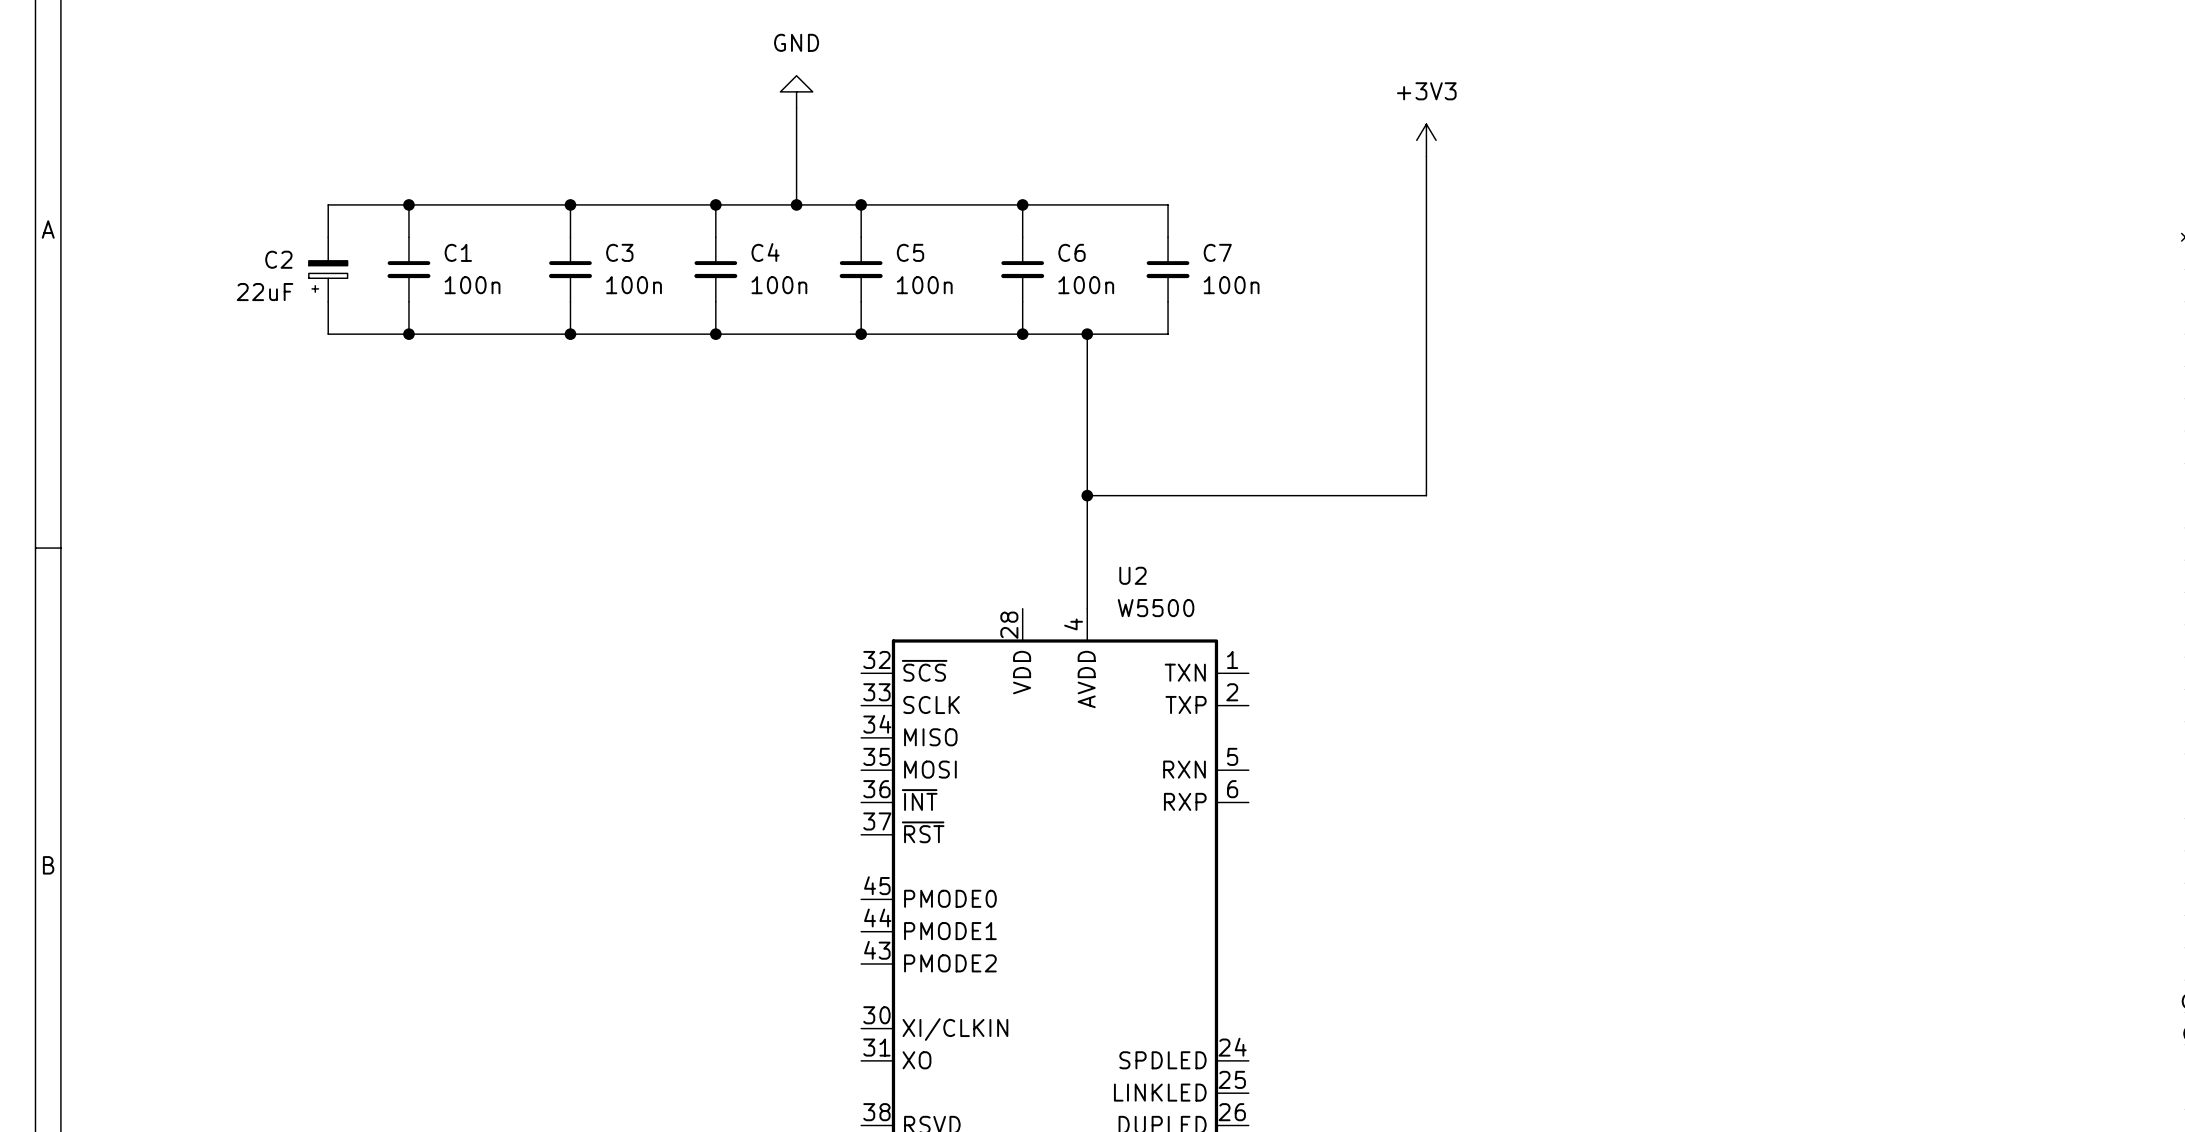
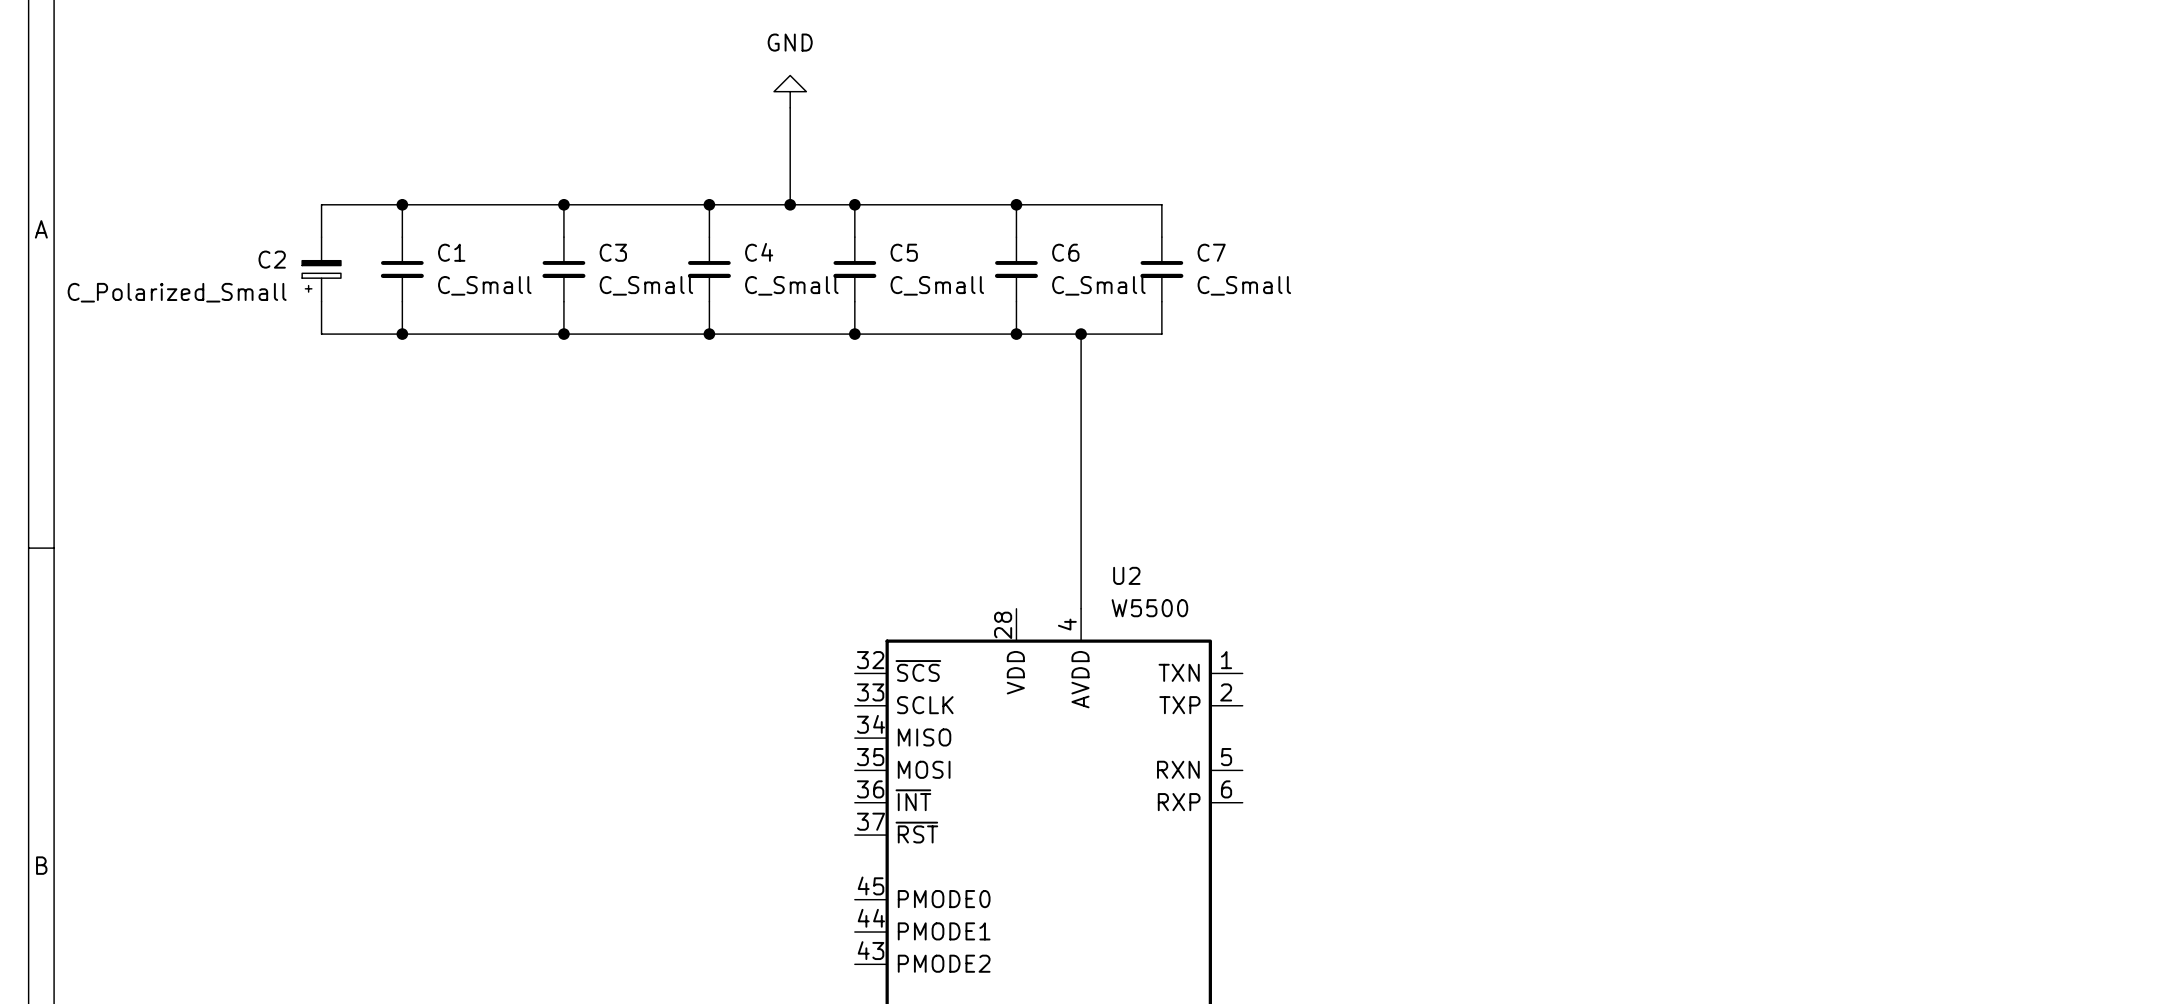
power symbol: +3V3 (1426, 140) -> none
wire: (1426, 156) (1426, 495) (1087, 495) -> none
C1 value: 100n (472, 285) -> C_Small (484, 285)
C3 value: 100n (634, 285) -> C_Small (646, 285)
C4 value: 100n (779, 285) -> C_Small (791, 285)
C5 value: 100n (924, 285) -> C_Small (937, 285)
C6 value: 100n (1086, 285) -> C_Small (1098, 285)
C7 value: 100n (1231, 285) -> C_Small (1244, 285)
C2 value: 22uF (265, 292) -> C_Polarized_Small (177, 292)
junction: (1087, 495) -> none

